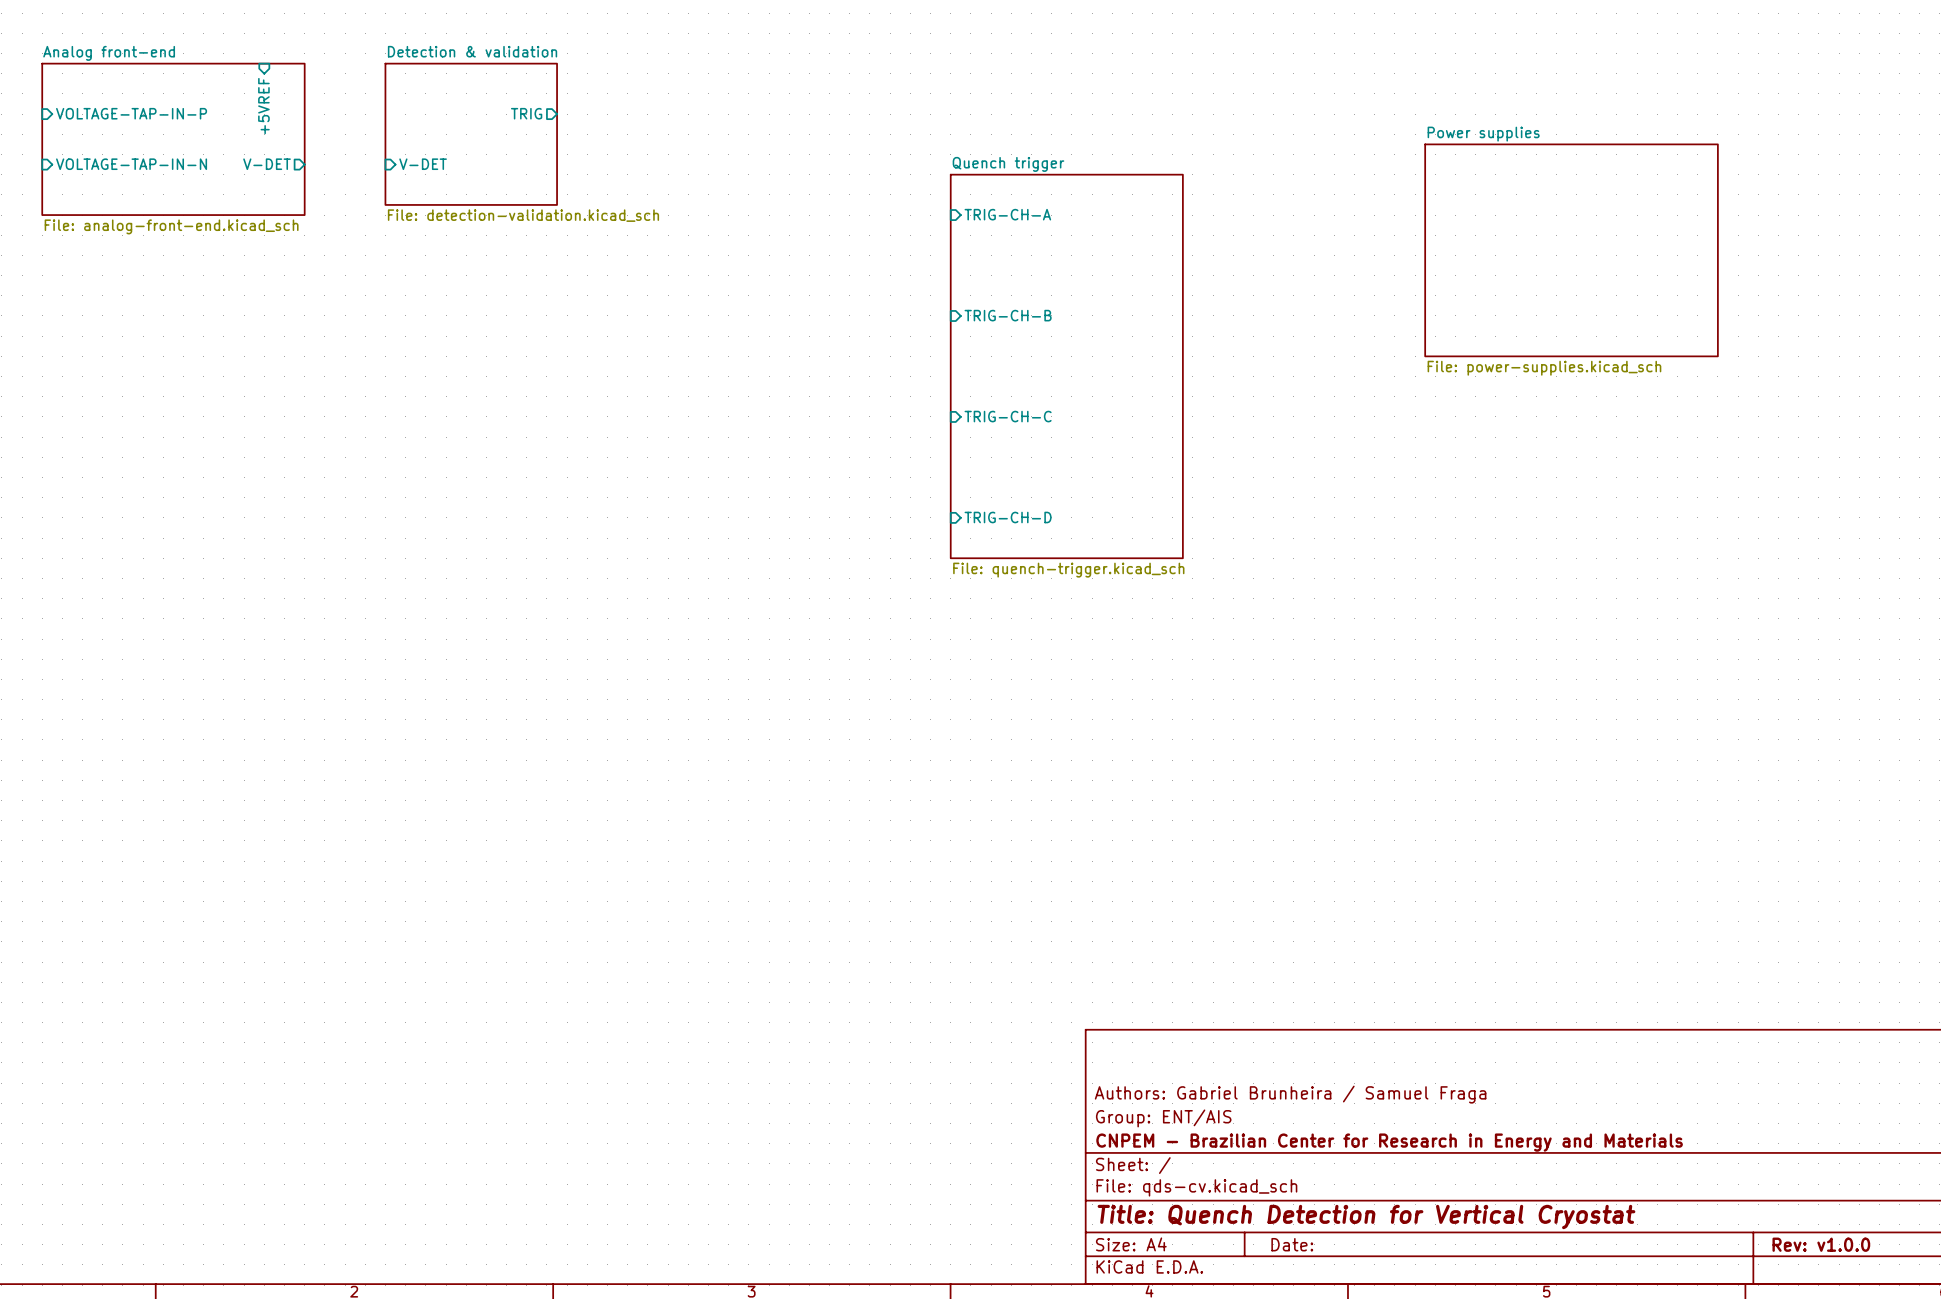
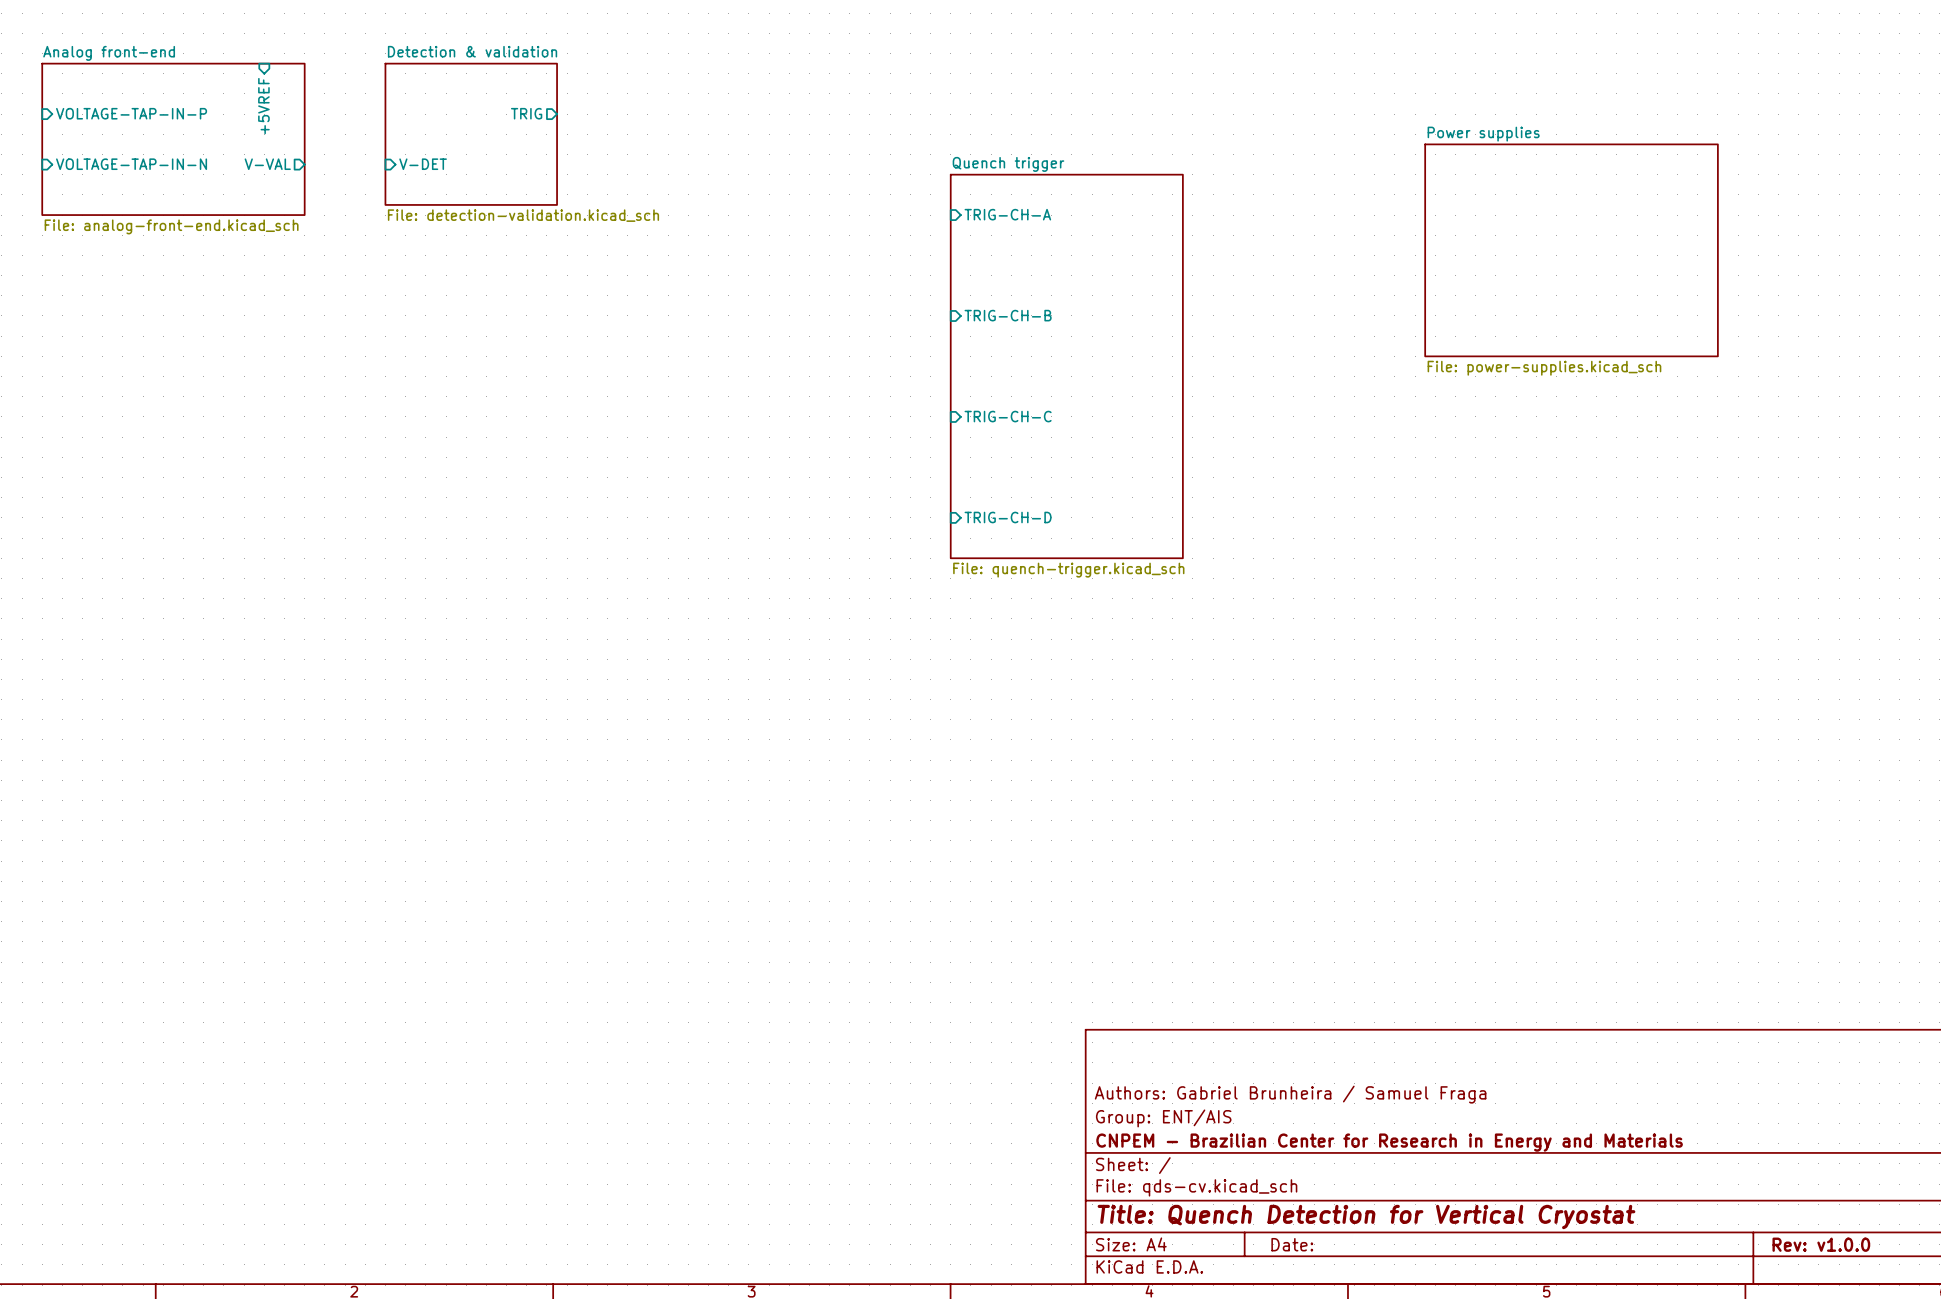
sheet pin: V-DET (267, 164) -> V-VAL (267, 164)

